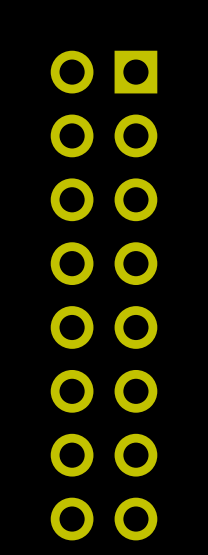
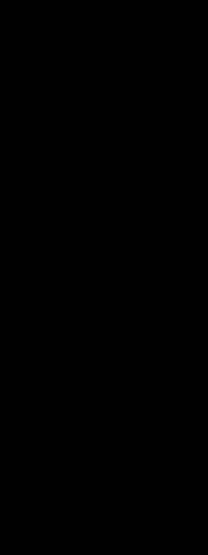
part: (104, 295) -> none

